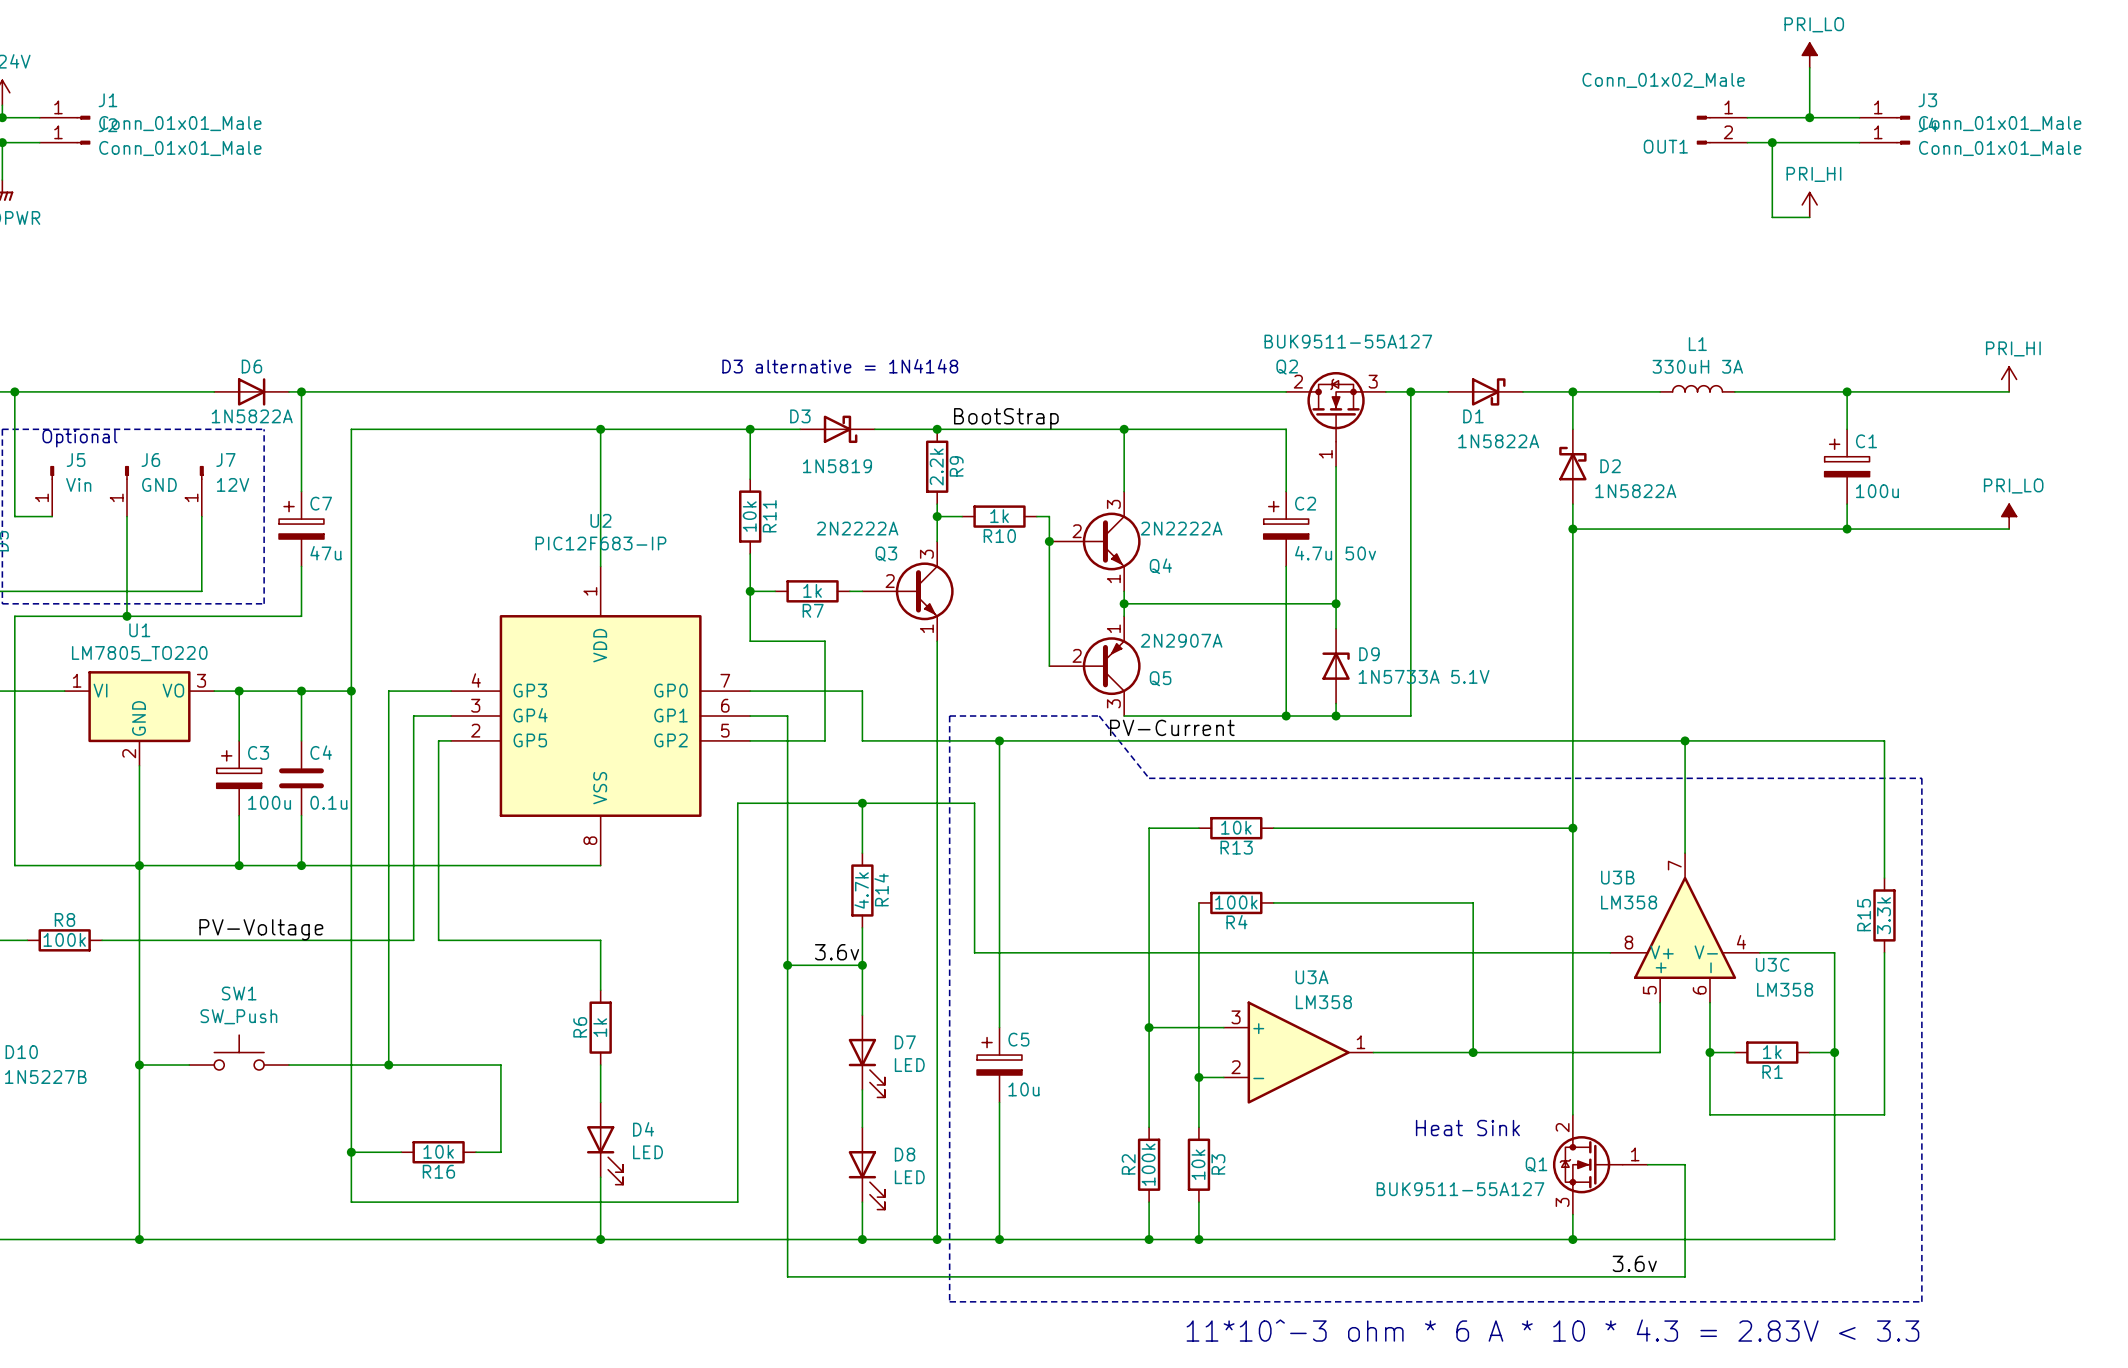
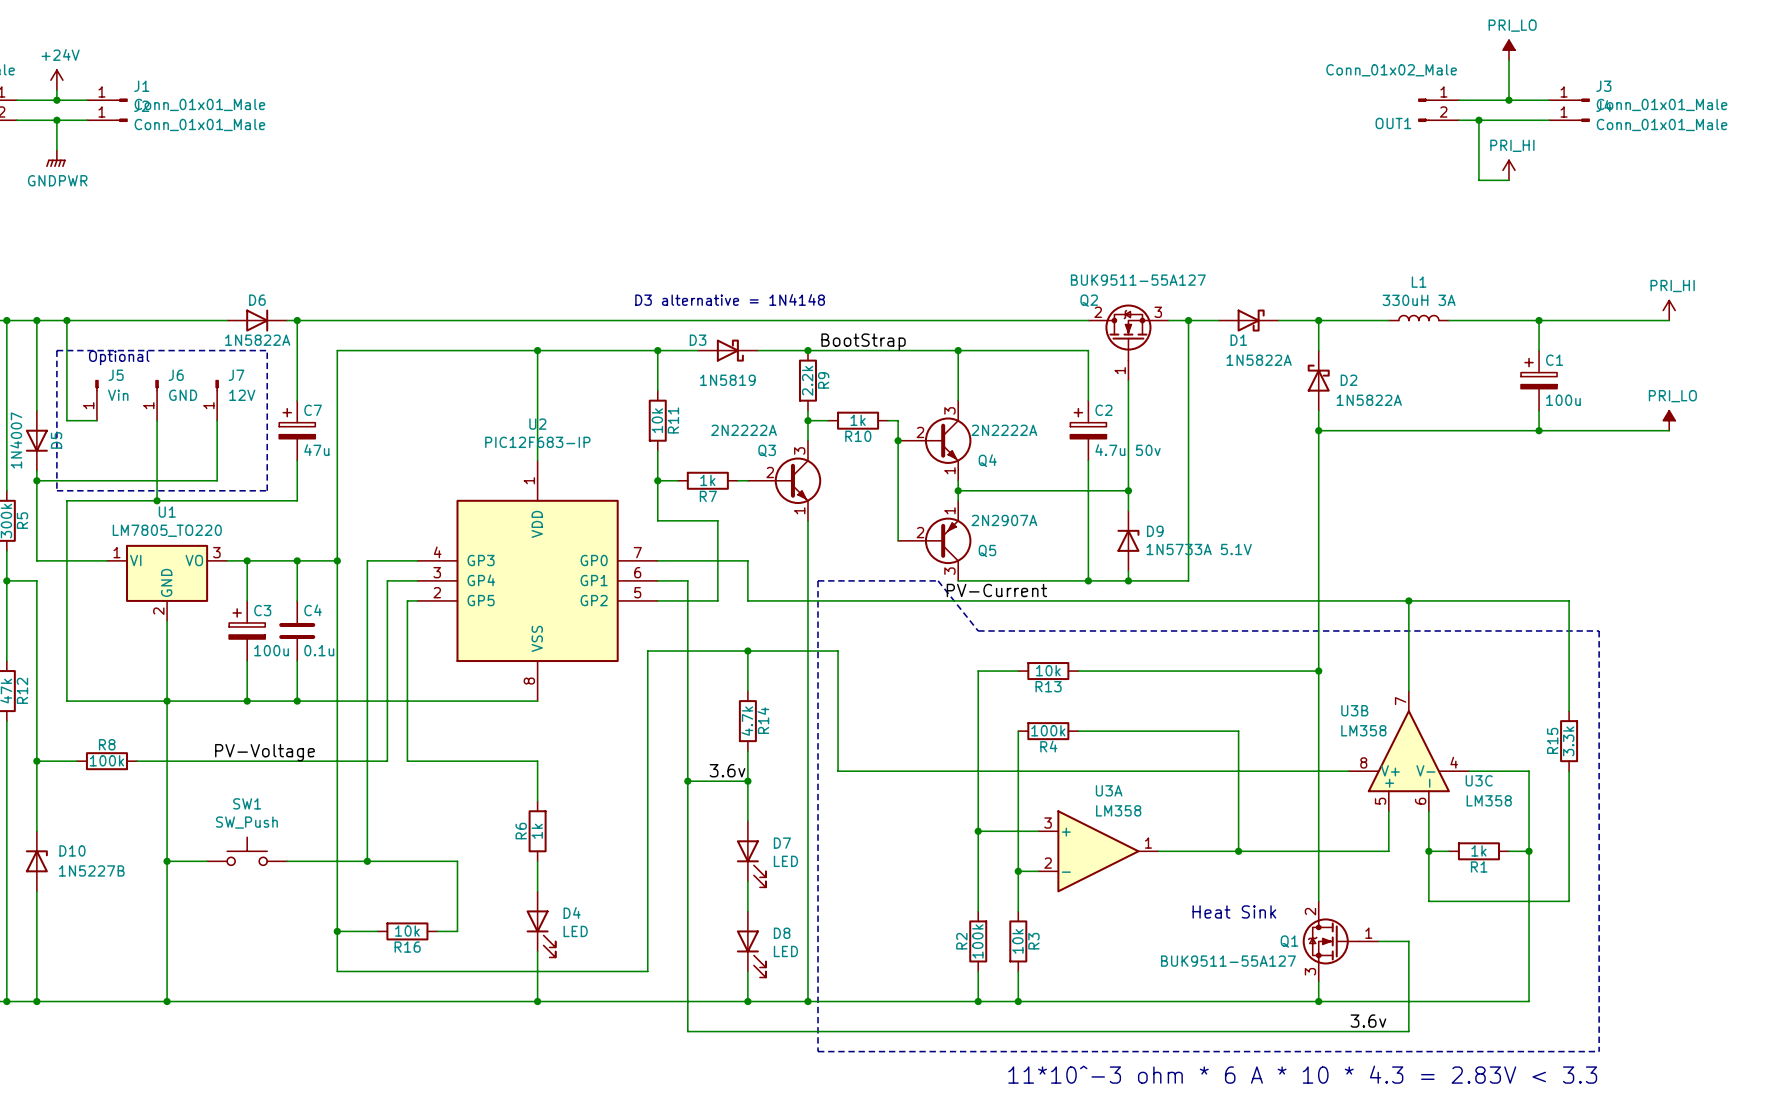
wire: (999, 740) (999, 1027) -> none
junction: (999, 740) -> none
C5: 10u (999, 1065) -> none
wire: (999, 1102) (999, 1239) -> none
junction: (999, 1239) -> none

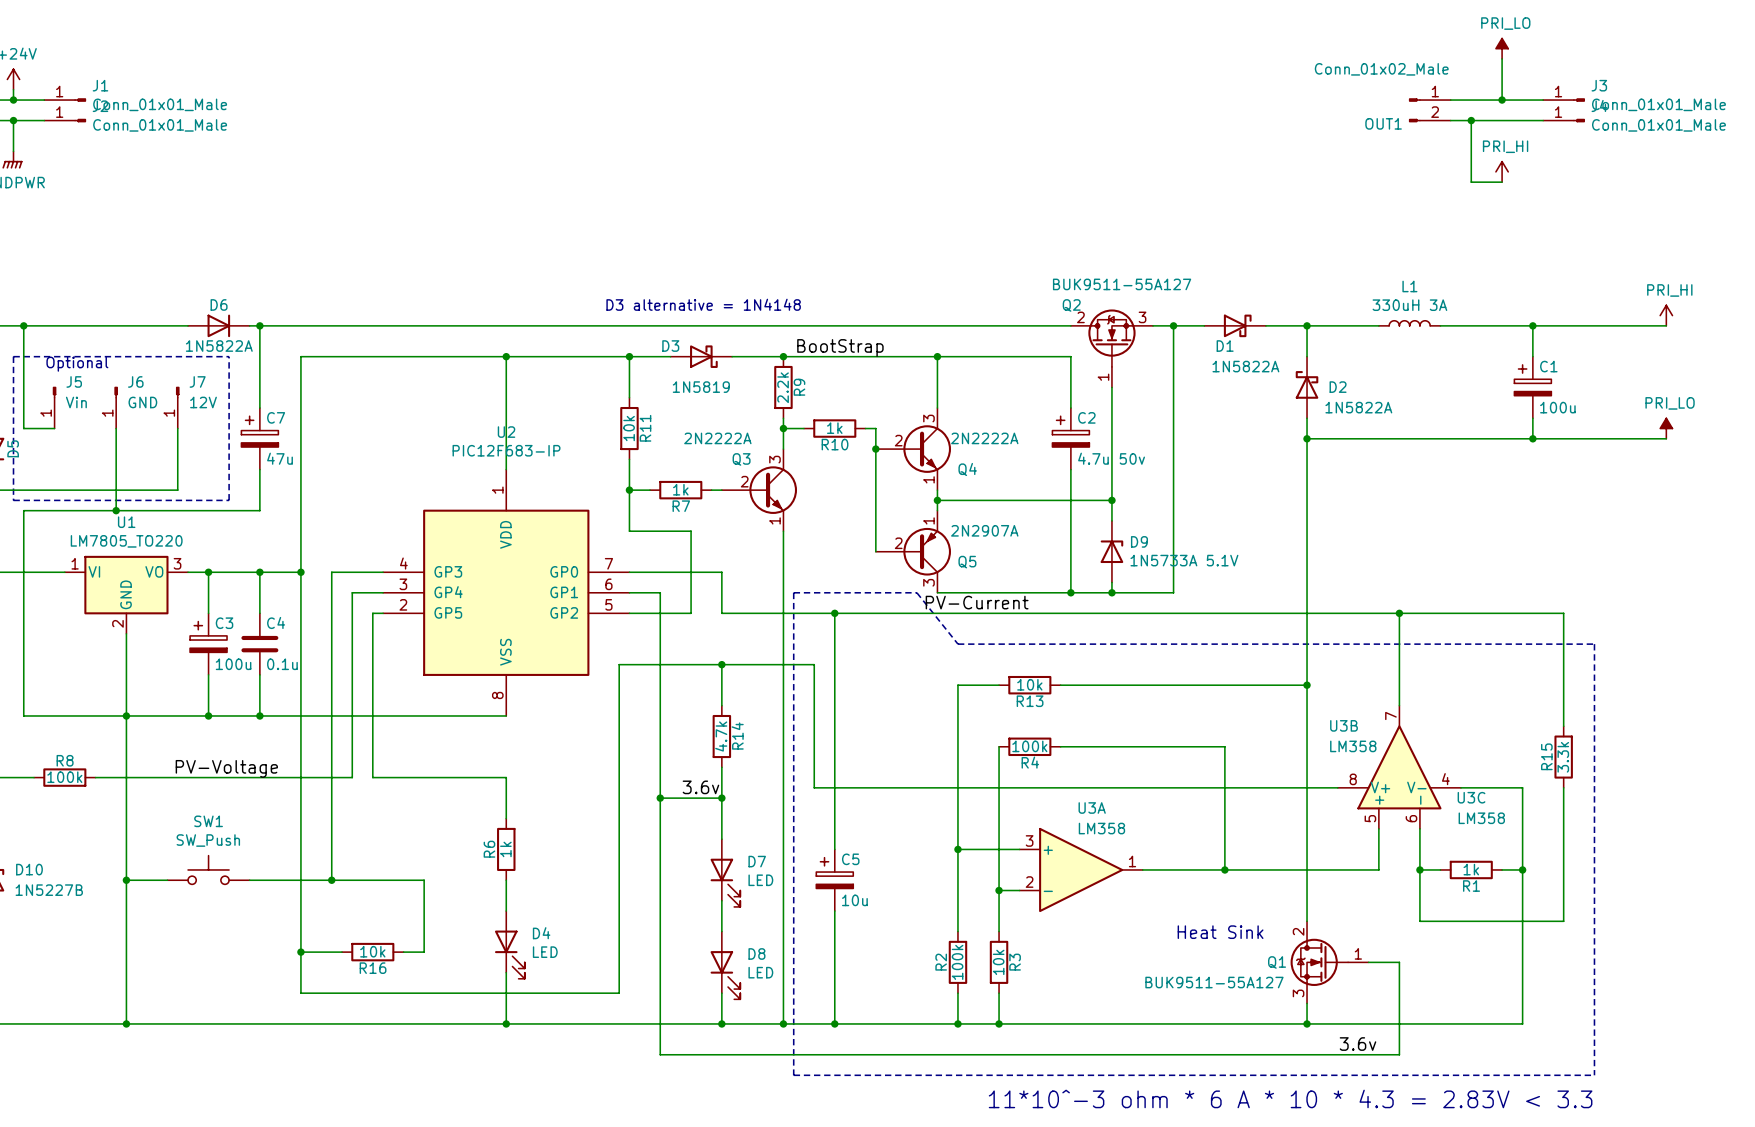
wire: none -> (834, 613) (834, 849)
junction: none -> (834, 613)
C5: none -> 10u (834, 880)
wire: none -> (834, 911) (834, 1023)
junction: none -> (834, 1023)

